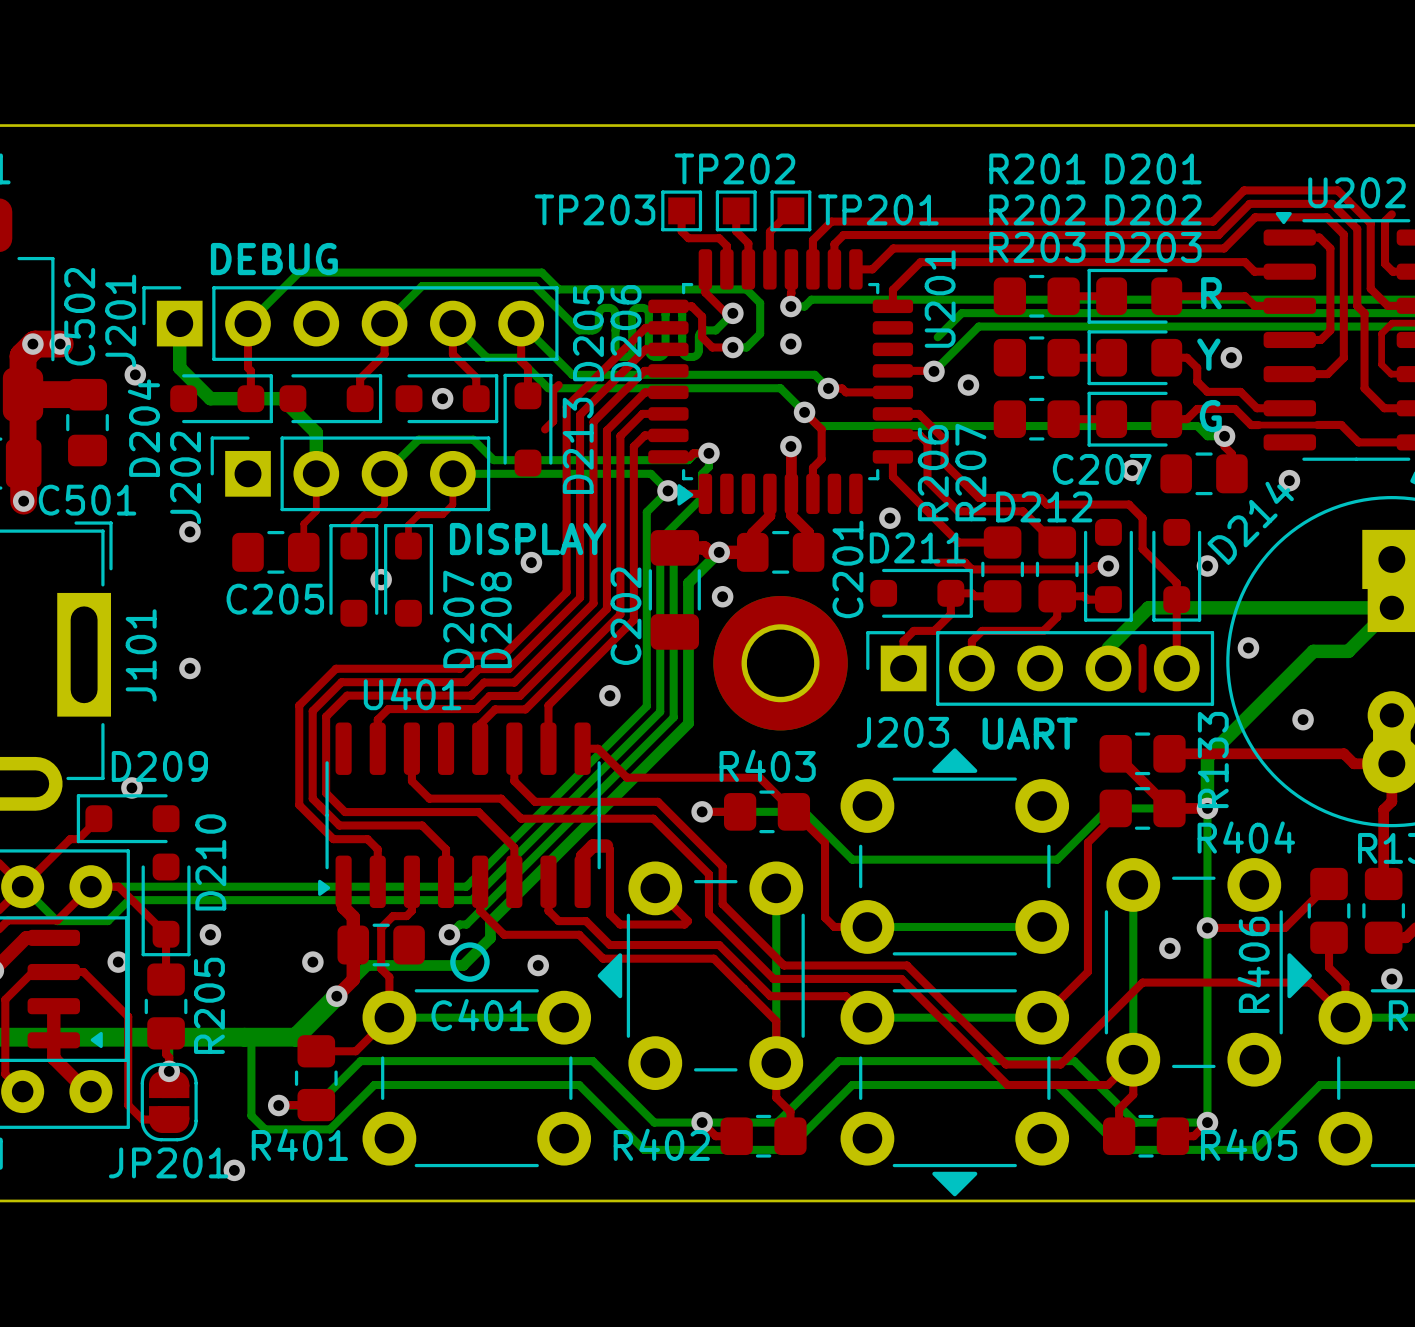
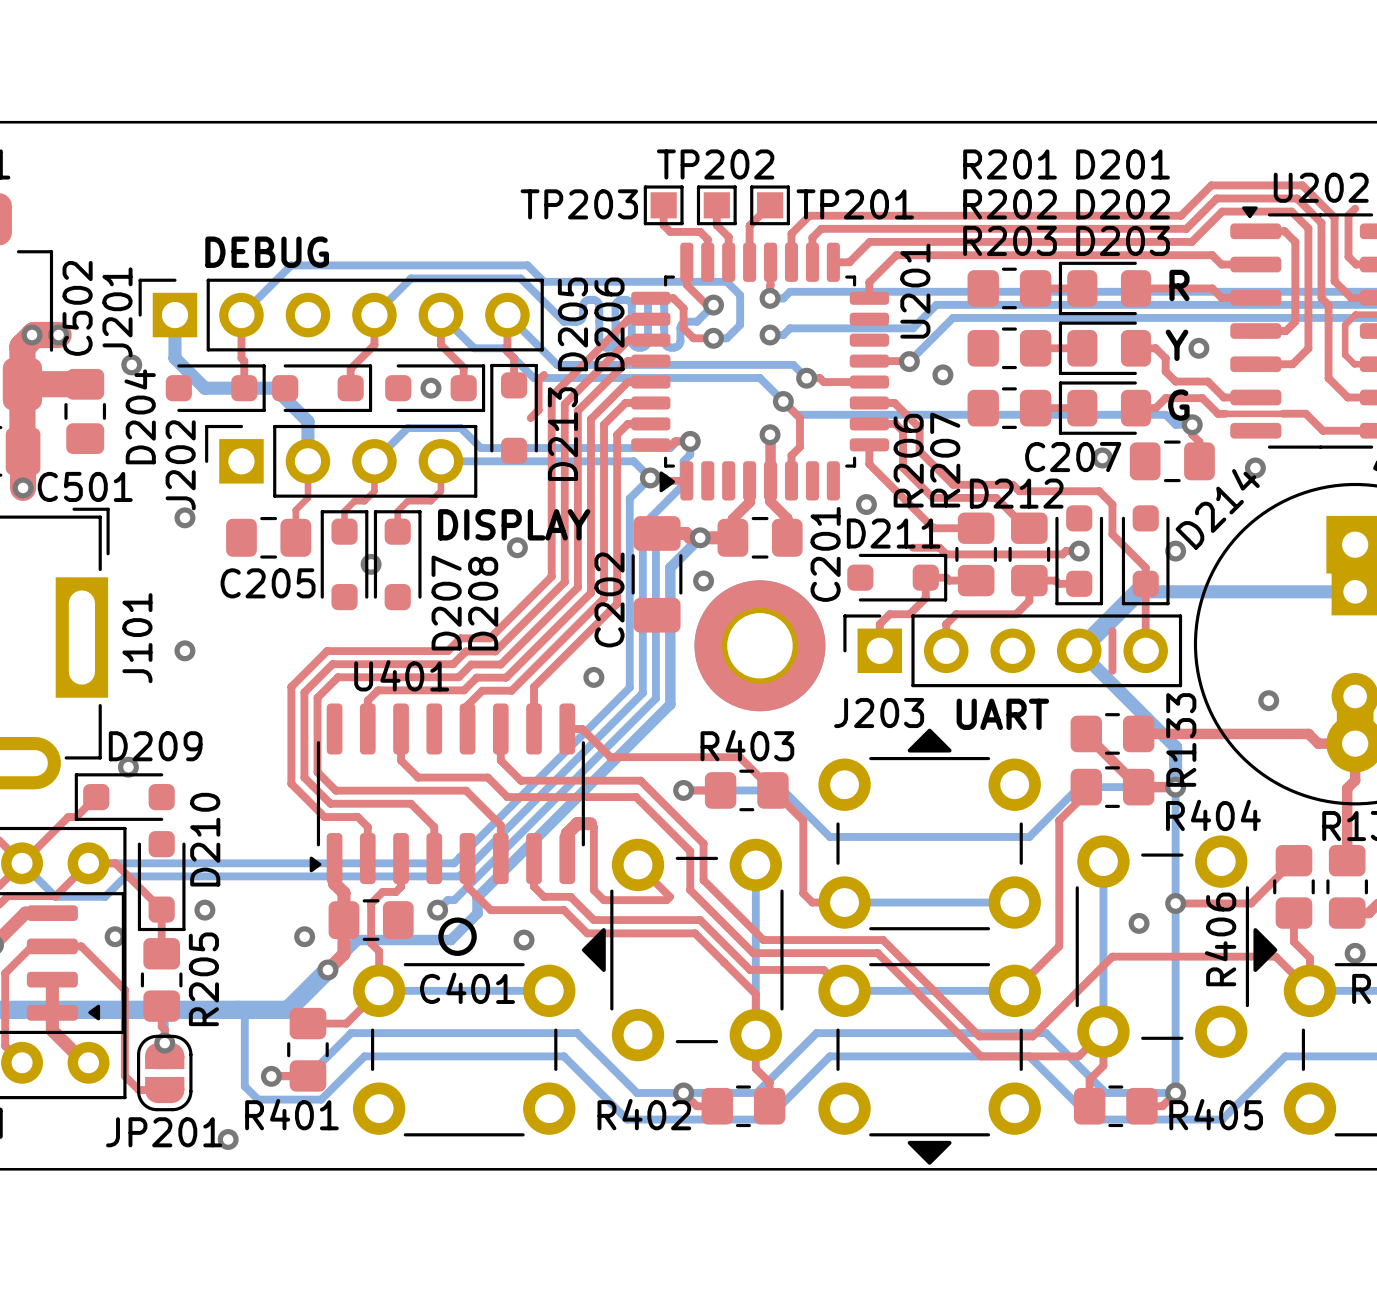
bottom track: none -> (913, 328) (790, 328) (783, 335) (770, 335)
bottom track: (1169, 607) (1148, 607) (1108, 647) -> (1138, 591) (1079, 650) (1175, 747)
bottom track: (1391, 607) (1348, 651) (1313, 651) (1207, 757) (1207, 767) -> none
via: (1248, 647) -> none

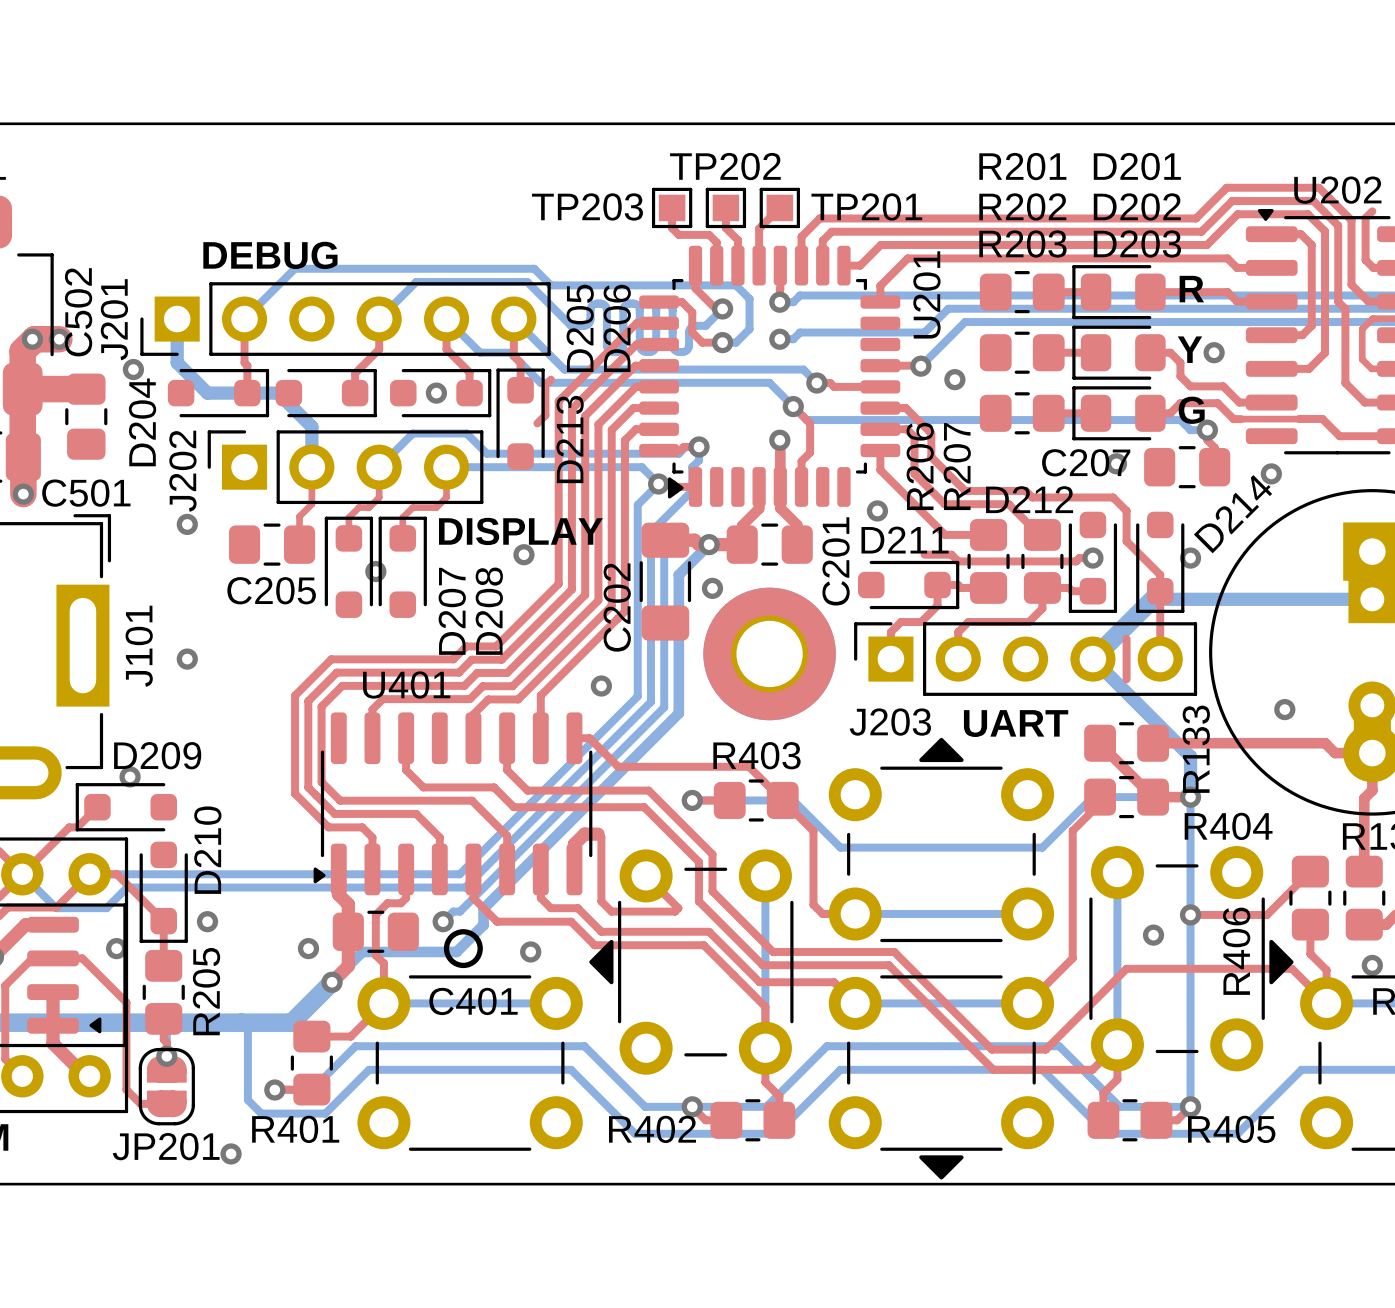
J201 footprint: [138, 278, 544, 352] -> [140, 282, 551, 356]

